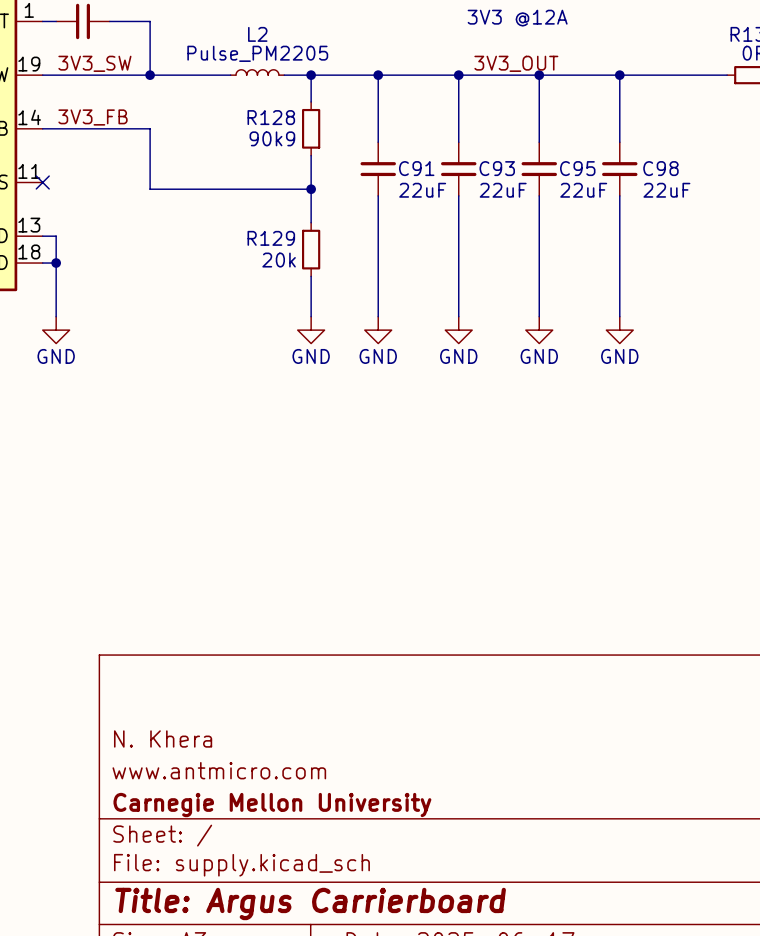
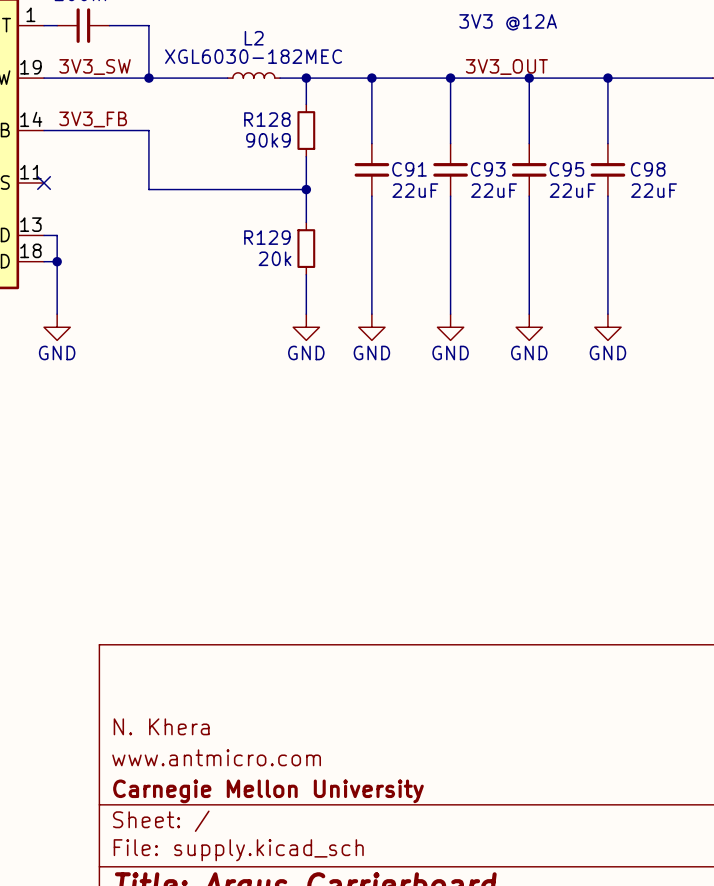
L2 value: Pulse_PM2205 (257, 53) -> XGL6030-182MEC (253, 56)

